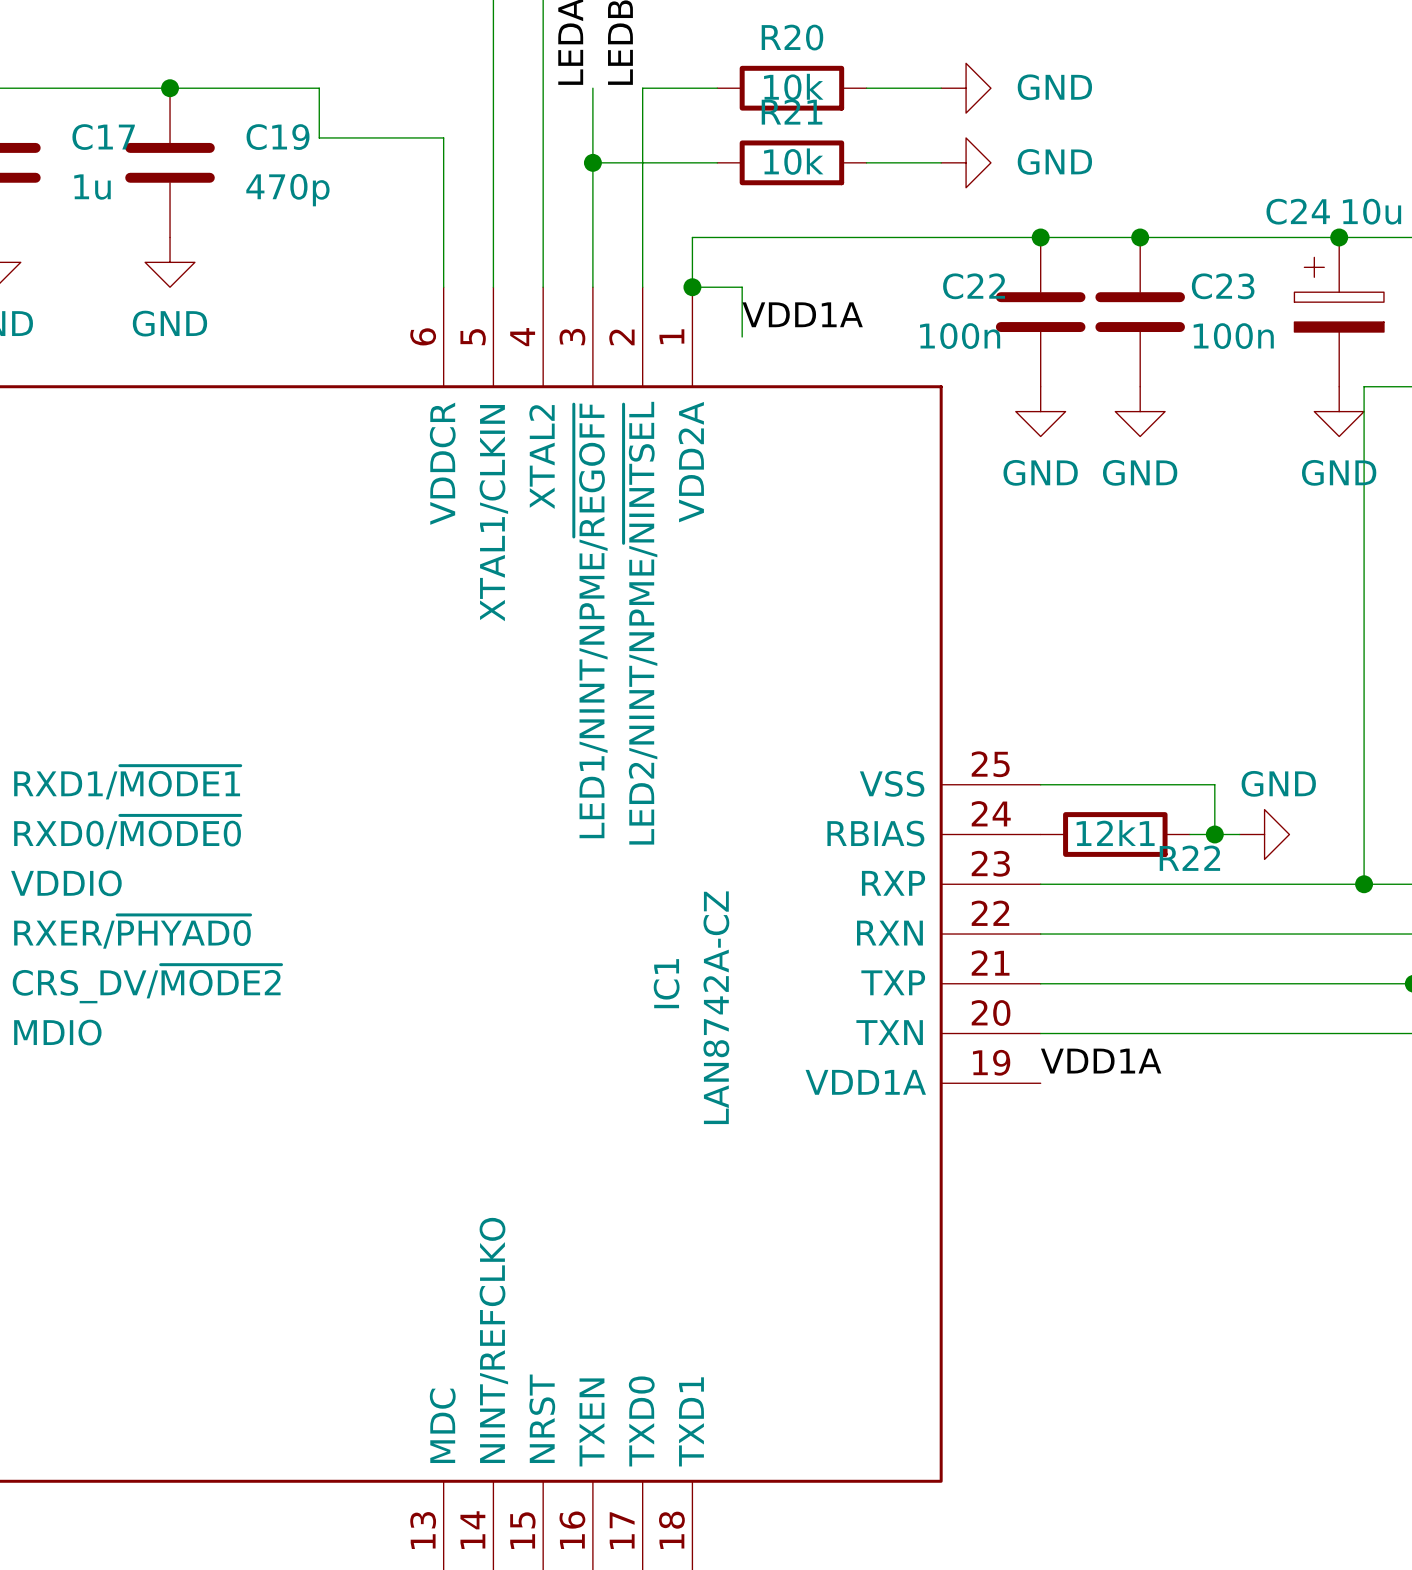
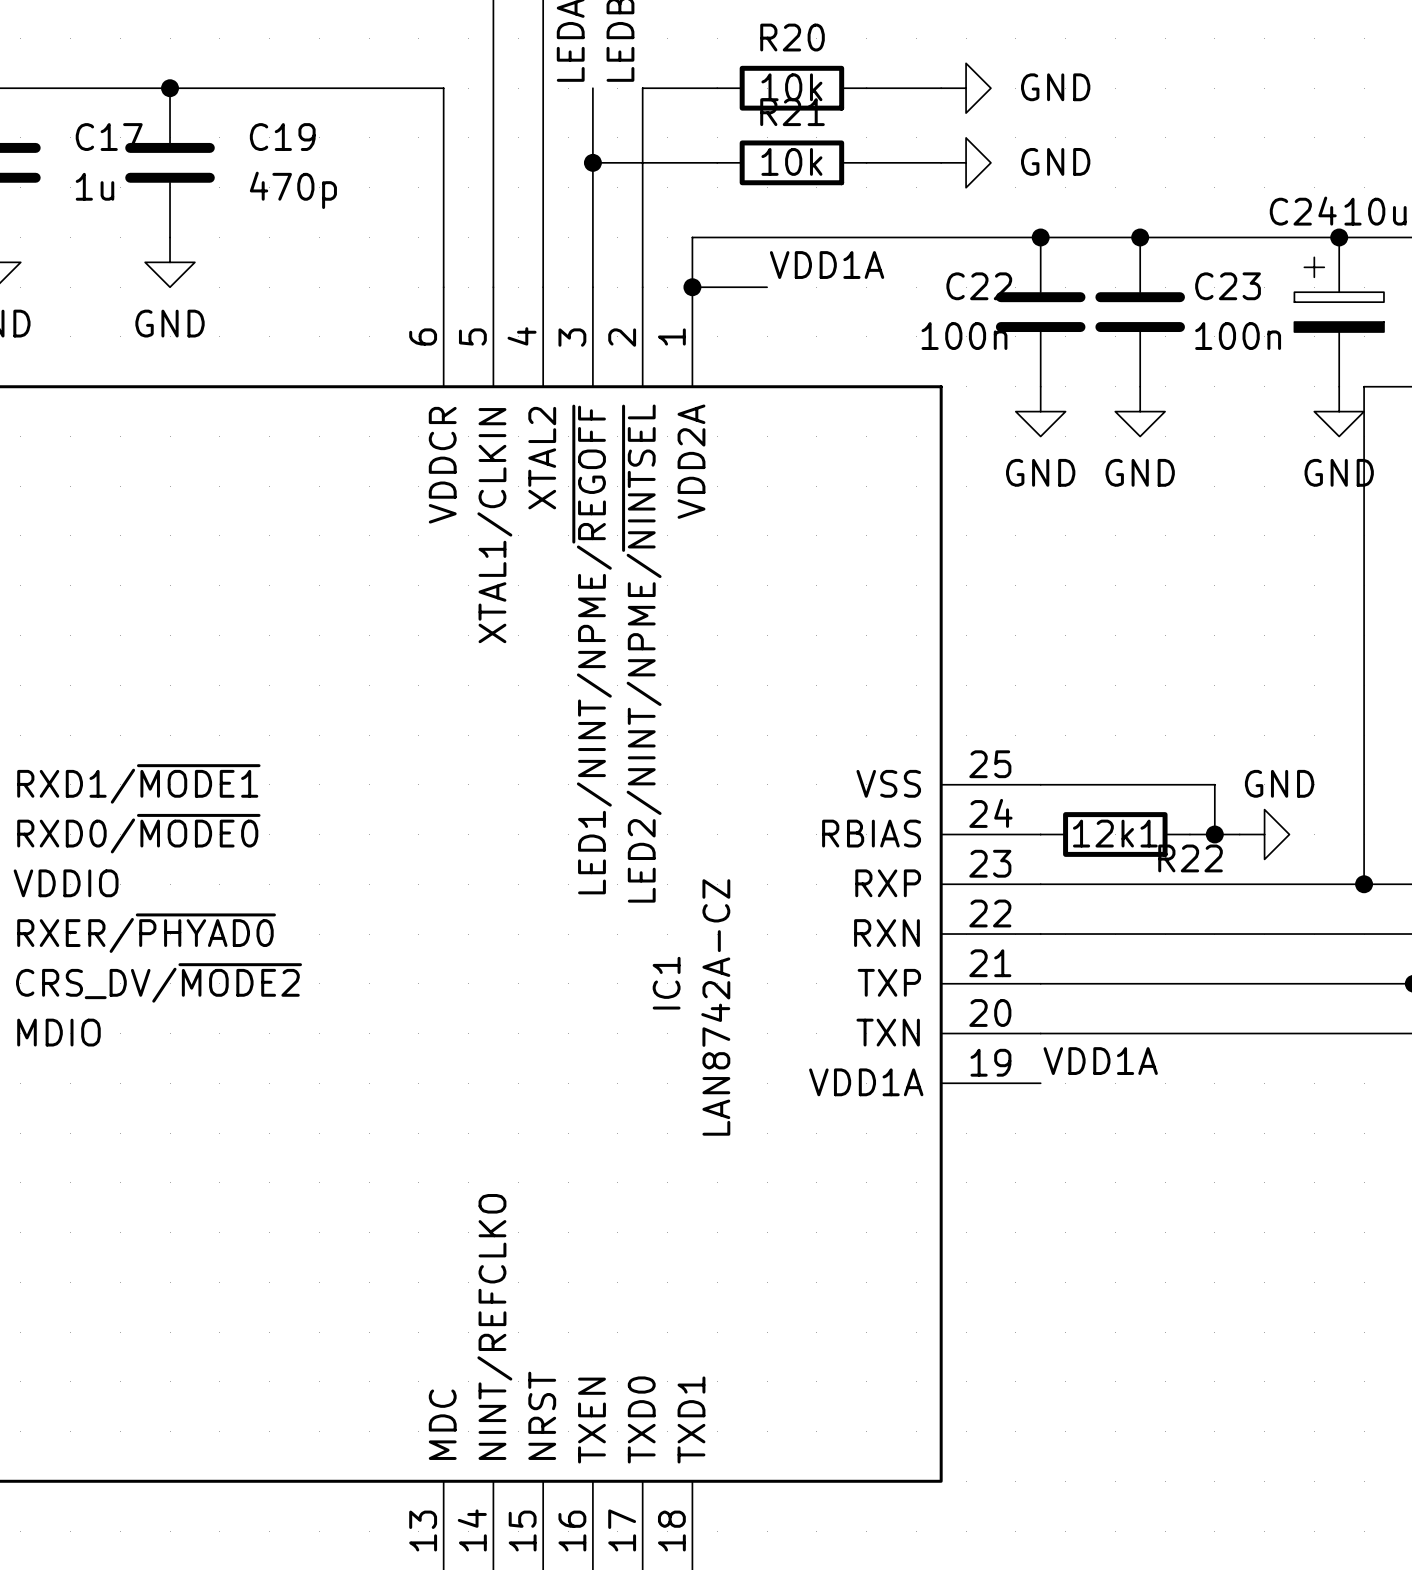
wire: (319, 88) (319, 137) (443, 137) -> (319, 88) (443, 88) (443, 137)
wire: (742, 287) (742, 336) -> (742, 287) (767, 287)
label position: VDD1A (802, 314) -> VDD1A (827, 265)

